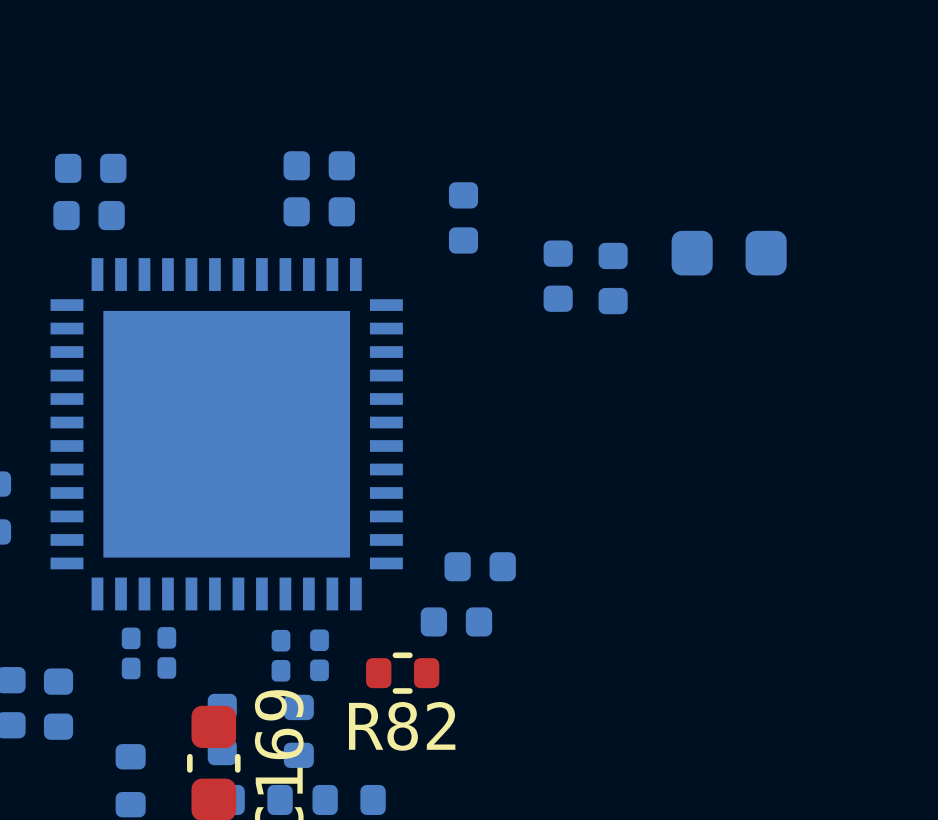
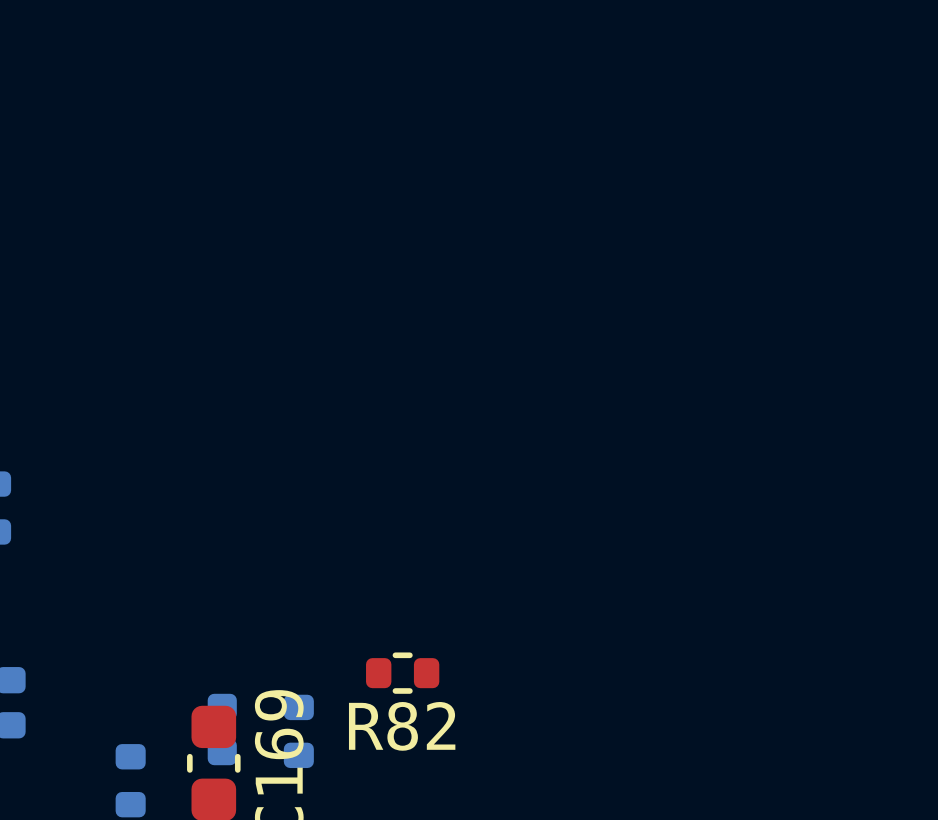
part: (319, 165) -> none
part: (90, 168) -> none
part: (319, 211) -> none
part: (89, 215) -> none
part: (463, 217) -> none
part: (729, 253) -> none
part: (558, 276) -> none
part: (613, 278) -> none
part: (226, 434) -> none
part: (480, 566) -> none
part: (456, 621) -> none
part: (166, 652) -> none
part: (131, 653) -> none
part: (280, 655) -> none
part: (319, 655) -> none
part: (58, 704) -> none
part: (256, 799) -> none
part: (349, 799) -> none

